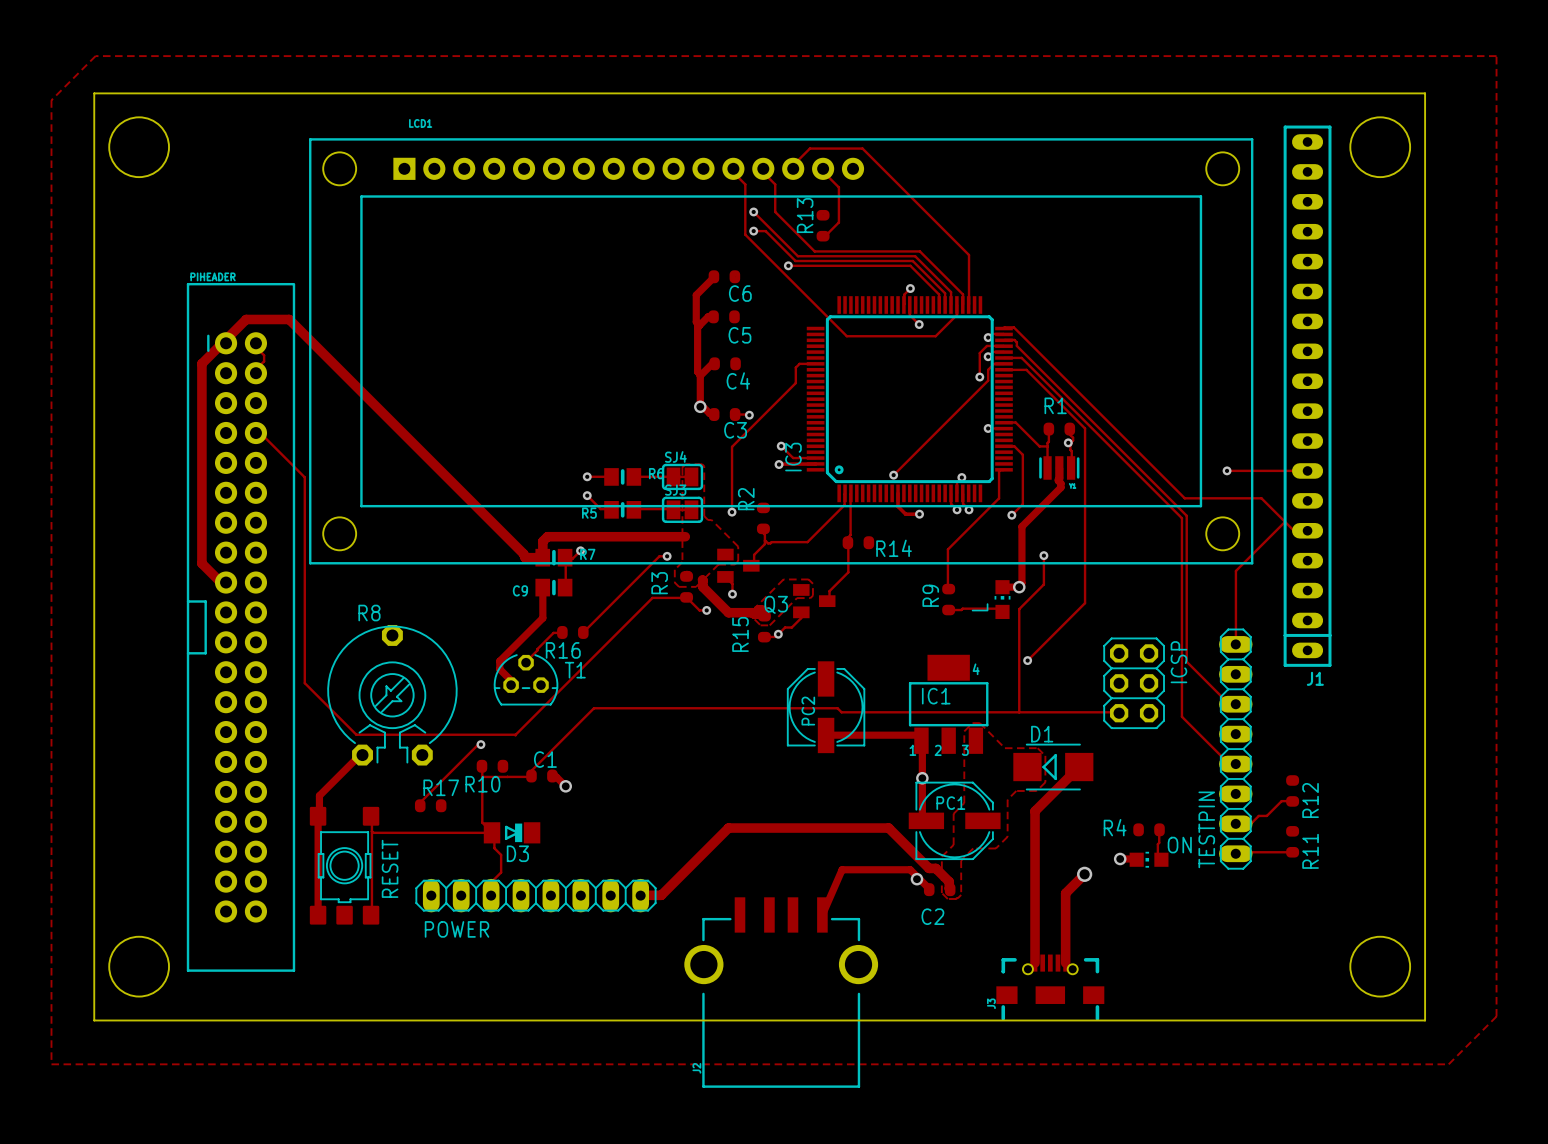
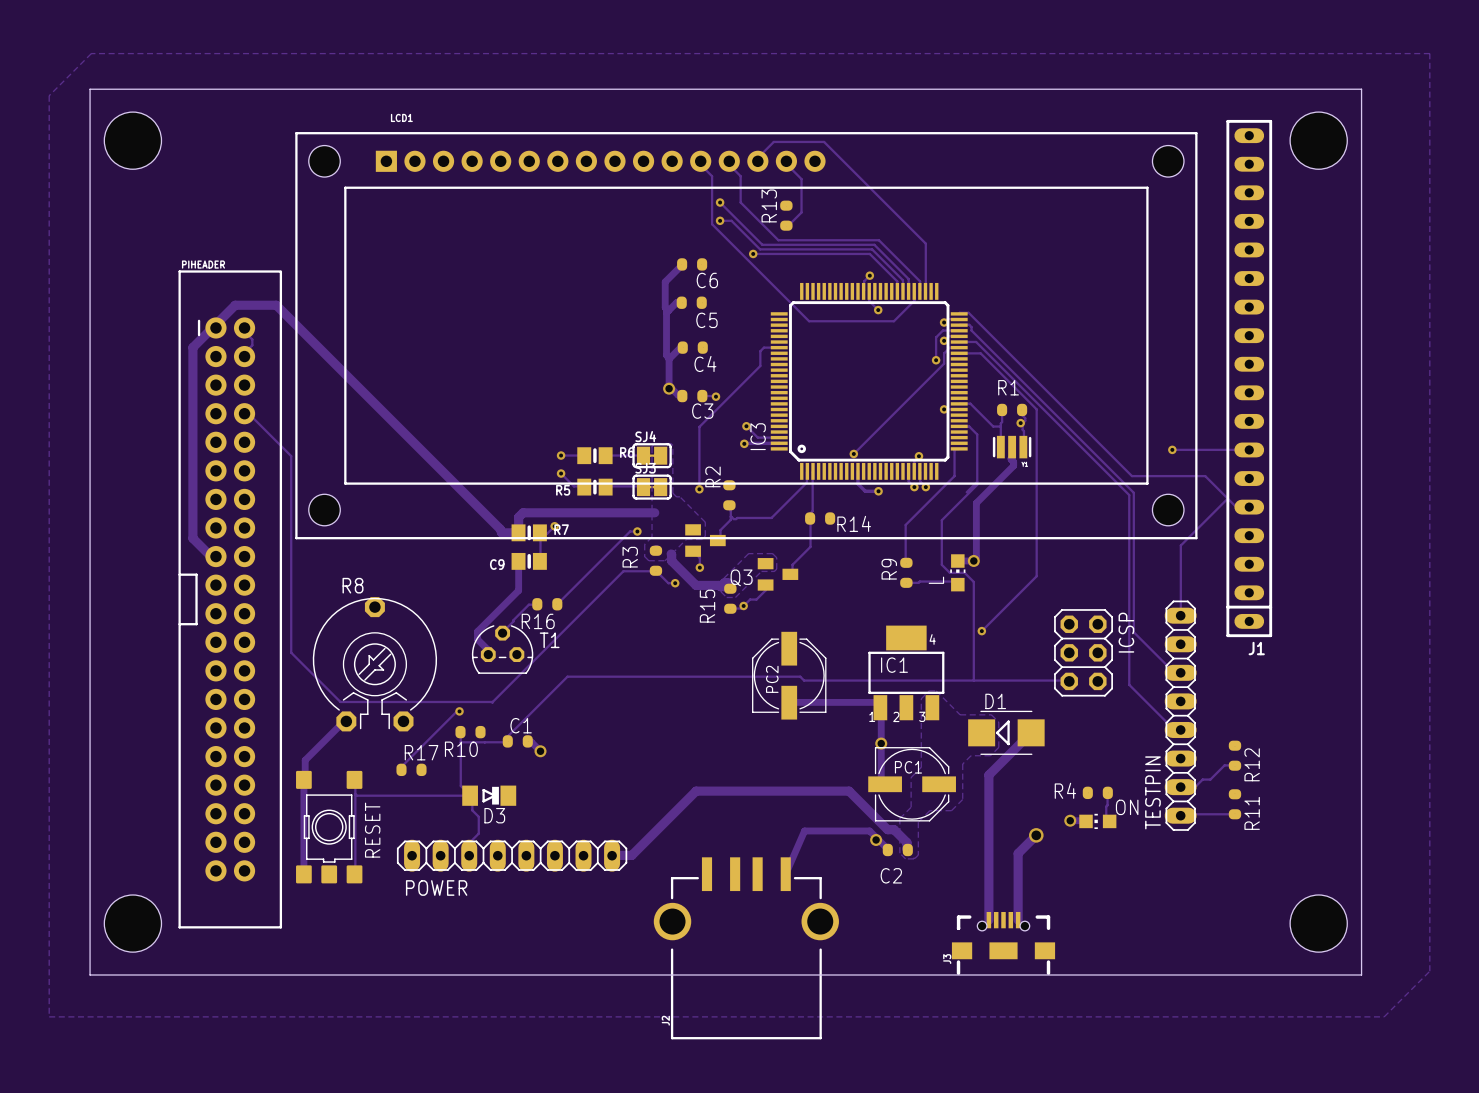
via: (1011, 515) -> none
track: (1043, 555) (1043, 584) (1019, 609) -> (977, 481) (977, 484) (941, 520) (941, 564) (949, 572) (964, 572) (973, 581)
via: (1043, 555) -> none

